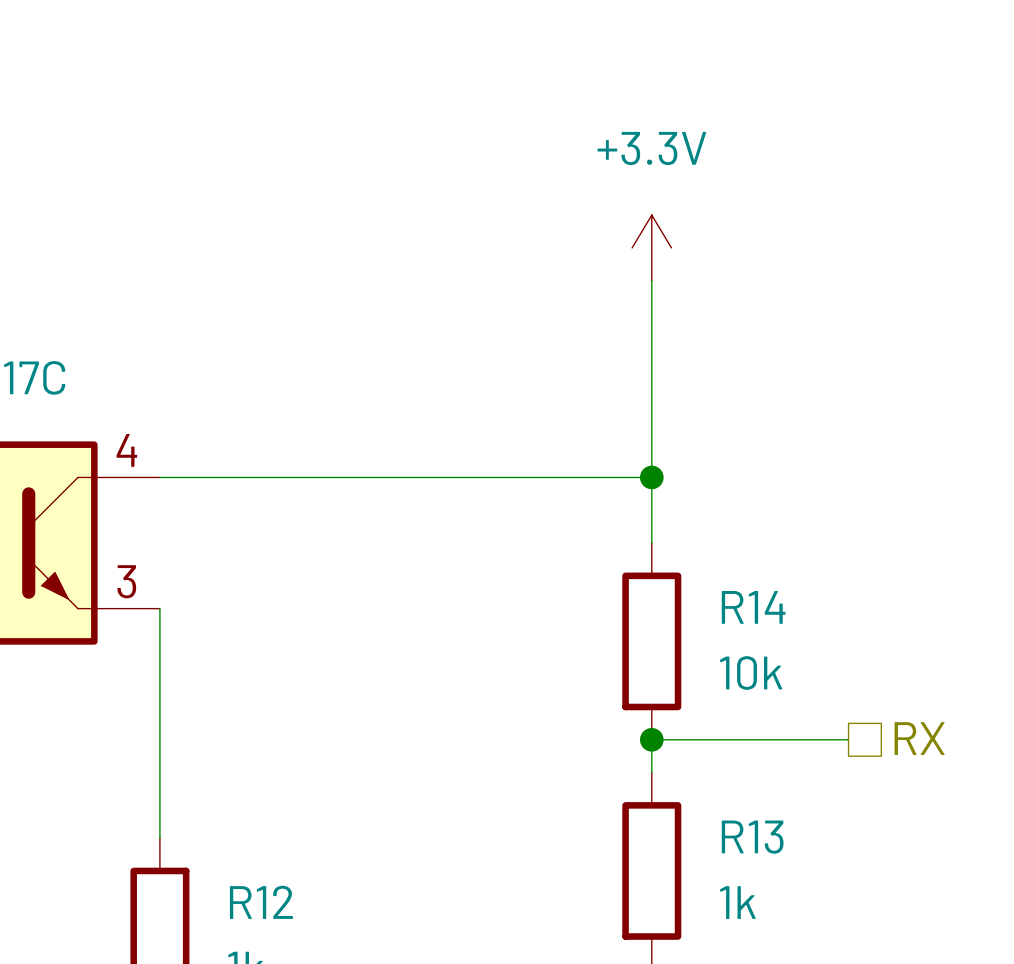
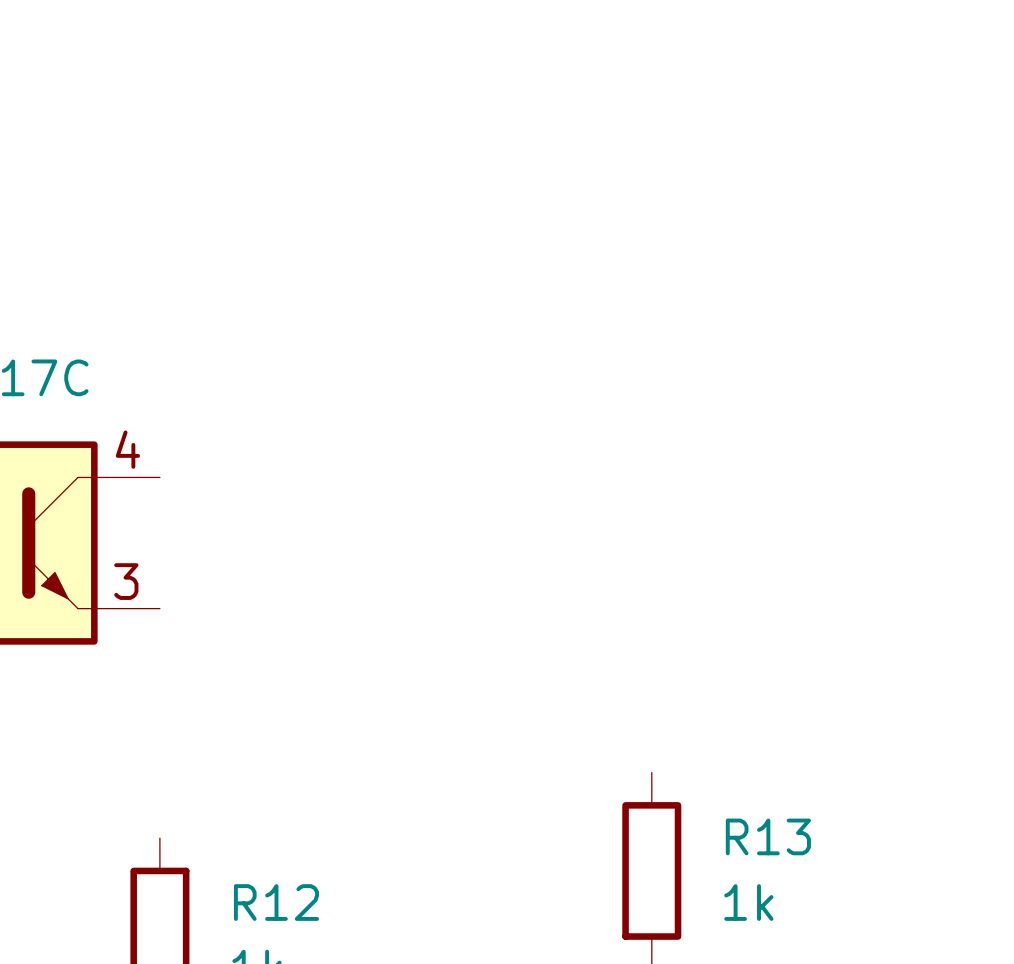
power symbol: +3.3V (651, 247) -> none
wire: (651, 280) (651, 543) -> none
wire: (159, 477) (651, 477) -> none
junction: (651, 477) -> none
wire: (159, 608) (159, 838) -> none
R14: 10k (651, 641) -> none
hierarchical label: RX (919, 738) -> none
junction: (651, 739) -> none
wire: (848, 739) (651, 739) (651, 772) -> none

